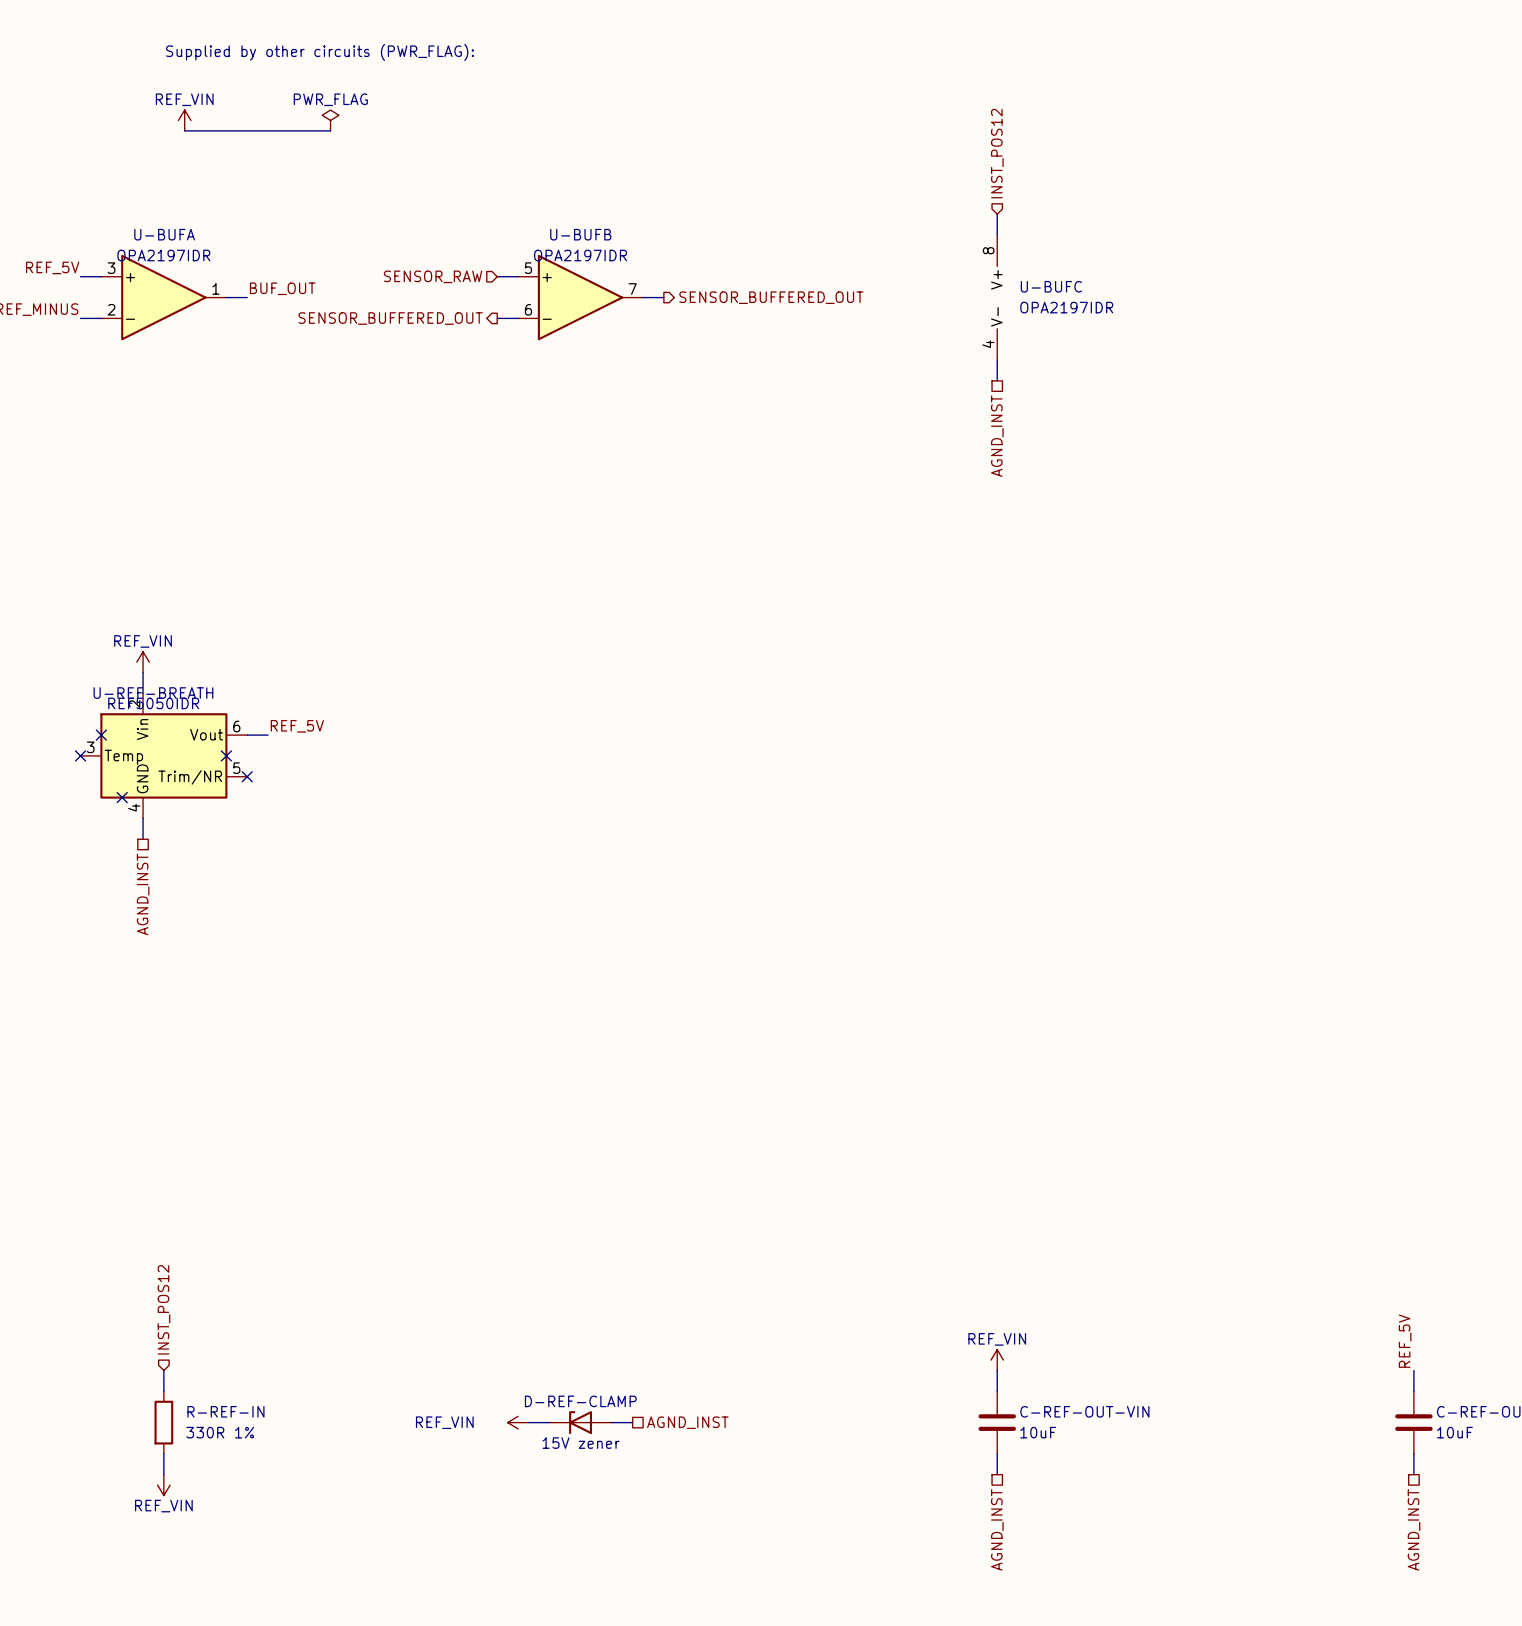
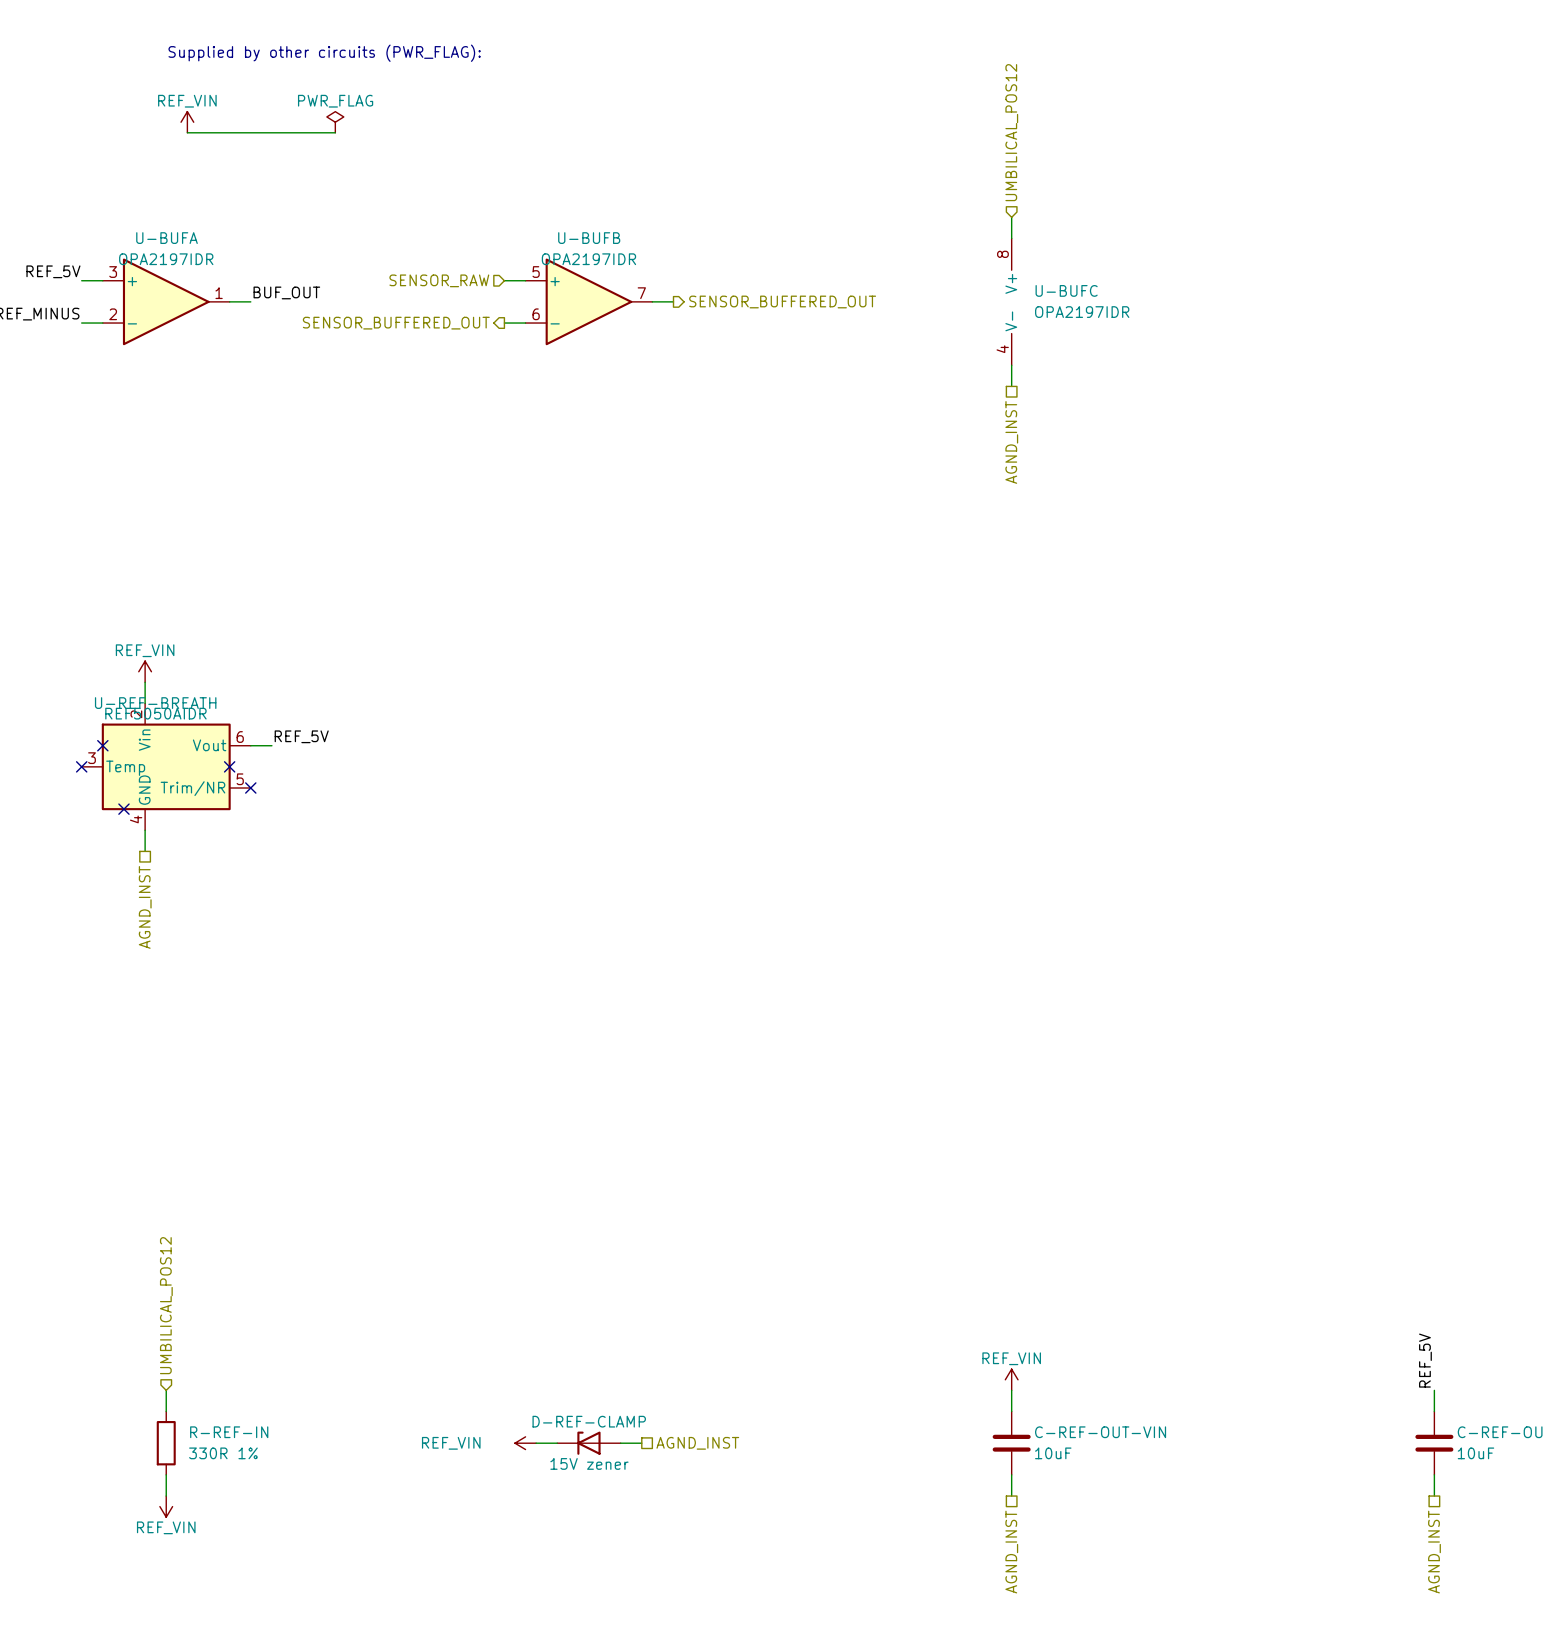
hierarchical label: INST_POS12 (997, 153) -> UMBILICAL_POS12 (1011, 132)
U-REF-BREATH value: REF5050IDR (153, 703) -> REF5050AIDR (155, 713)
hierarchical label: INST_POS12 (163, 1309) -> UMBILICAL_POS12 (166, 1305)

